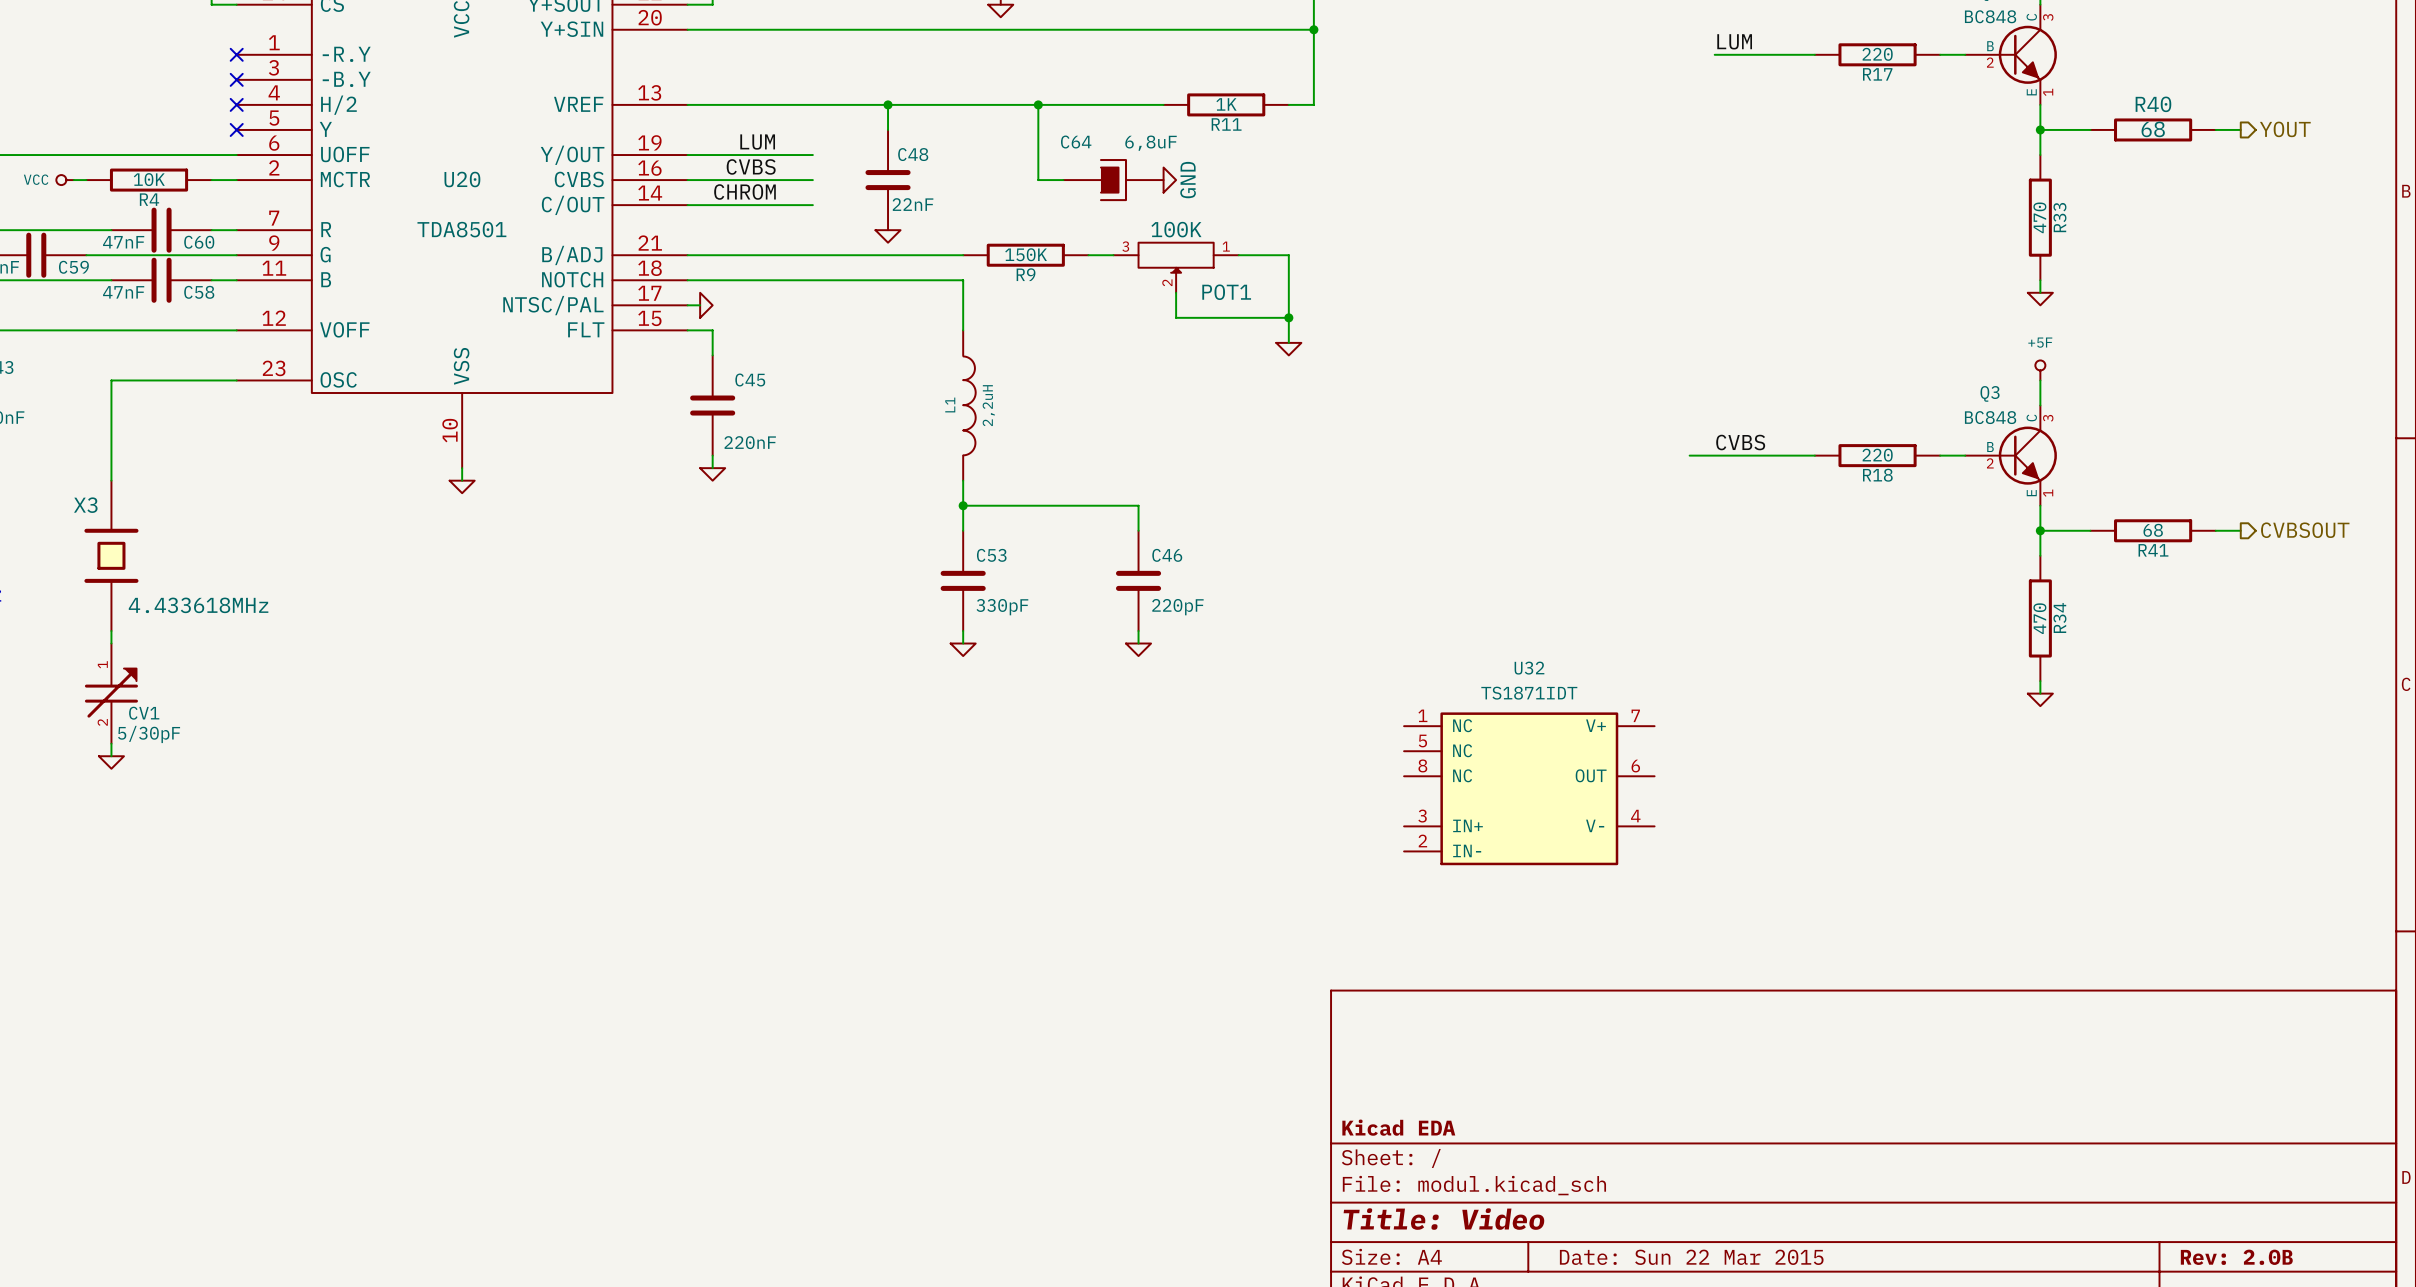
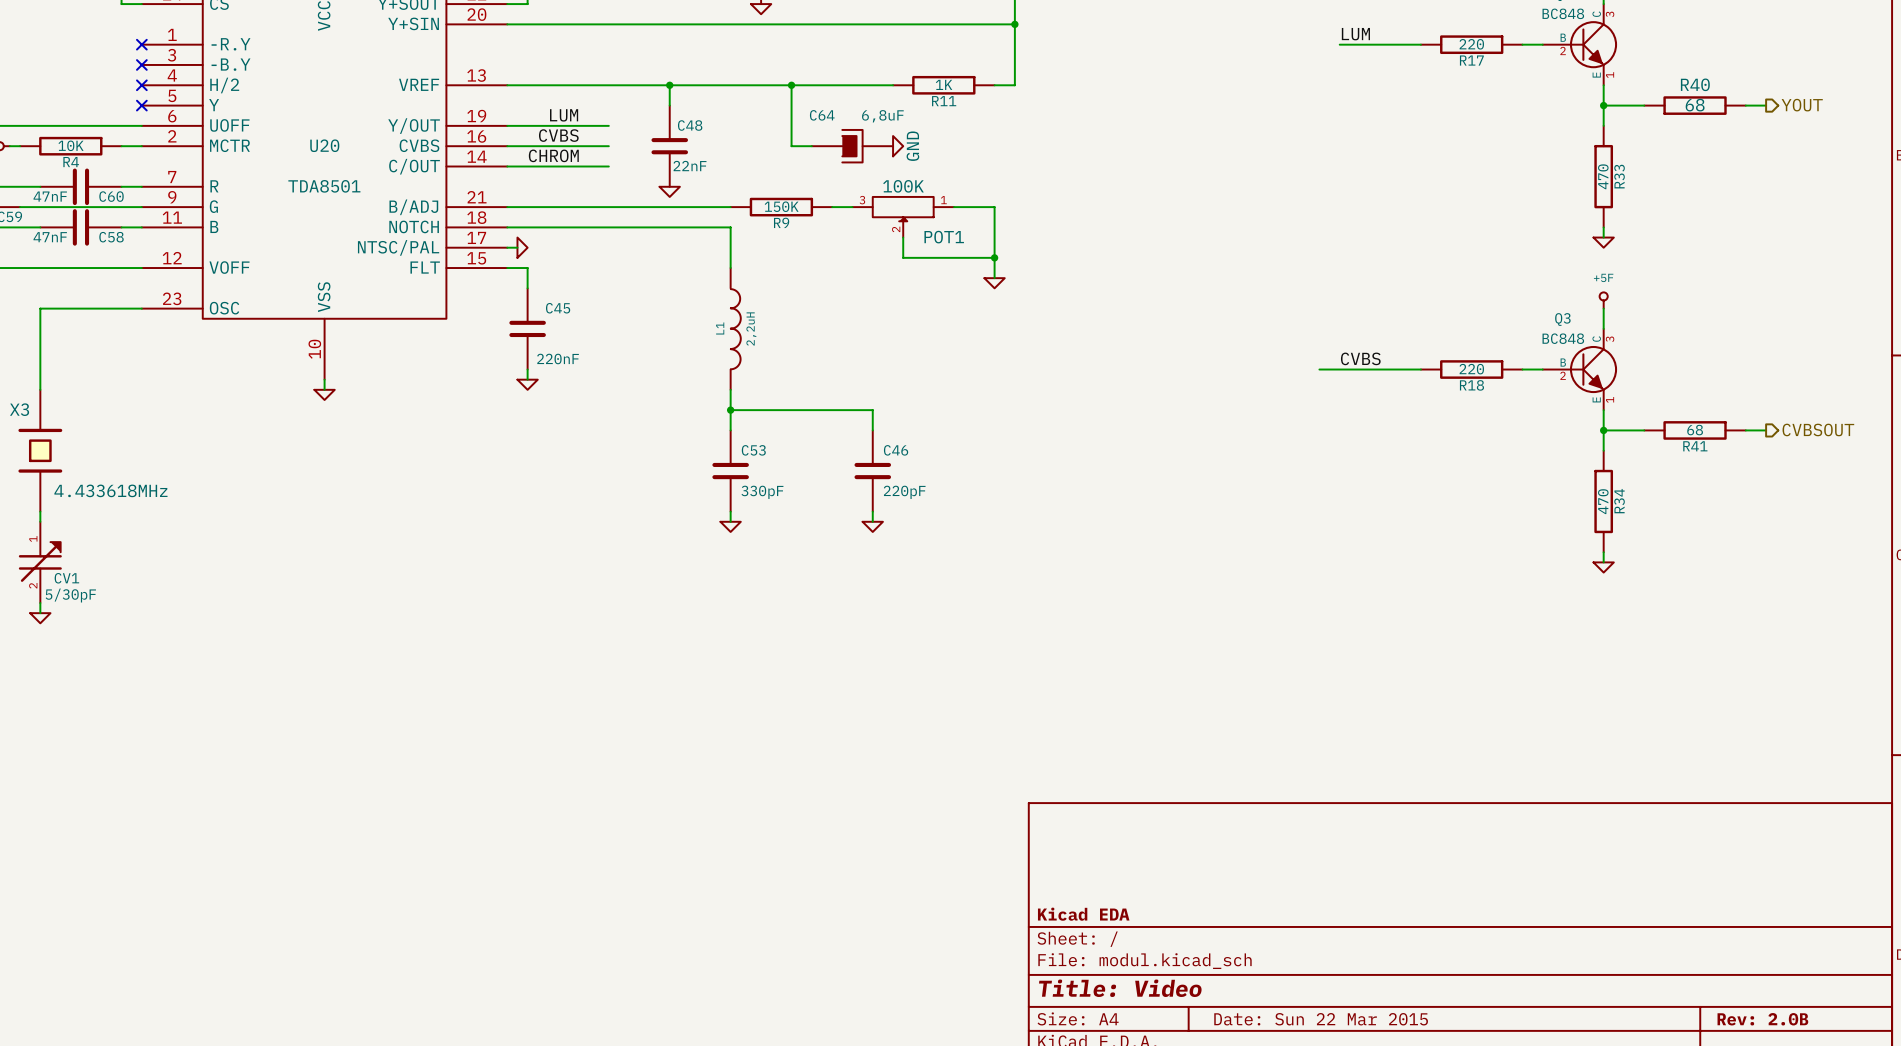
U32: TS1871IDT (1529, 788) -> none

